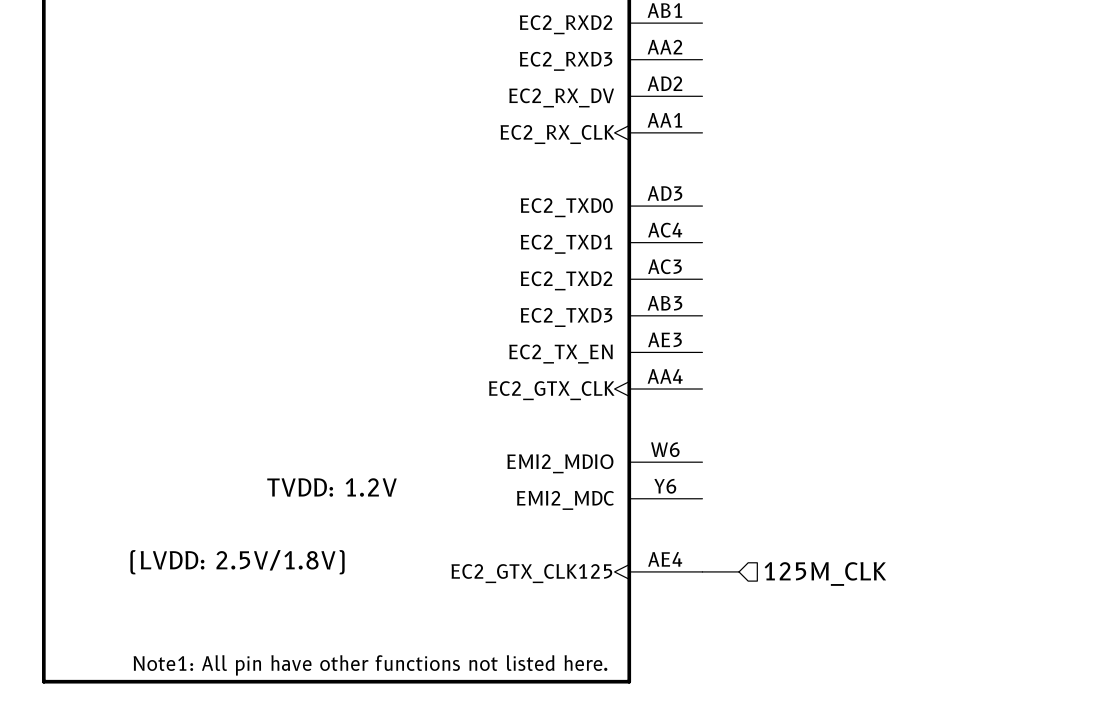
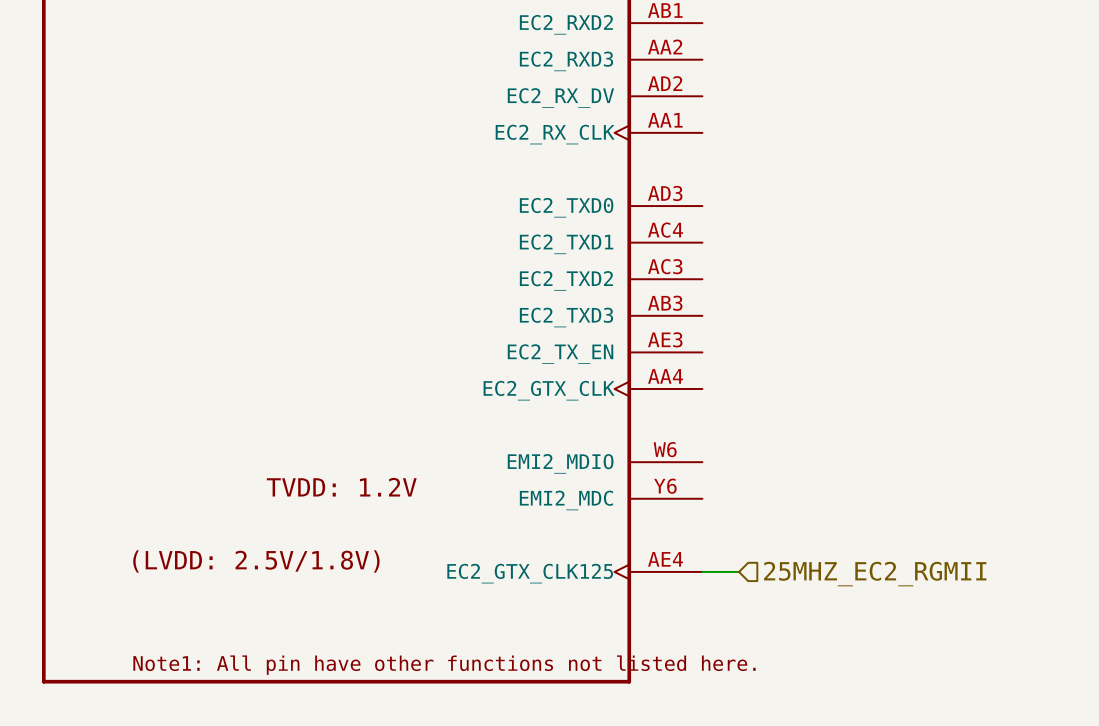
hierarchical label: 125M_CLK (825, 574) -> 25MHZ_EC2_RGMII (875, 574)

